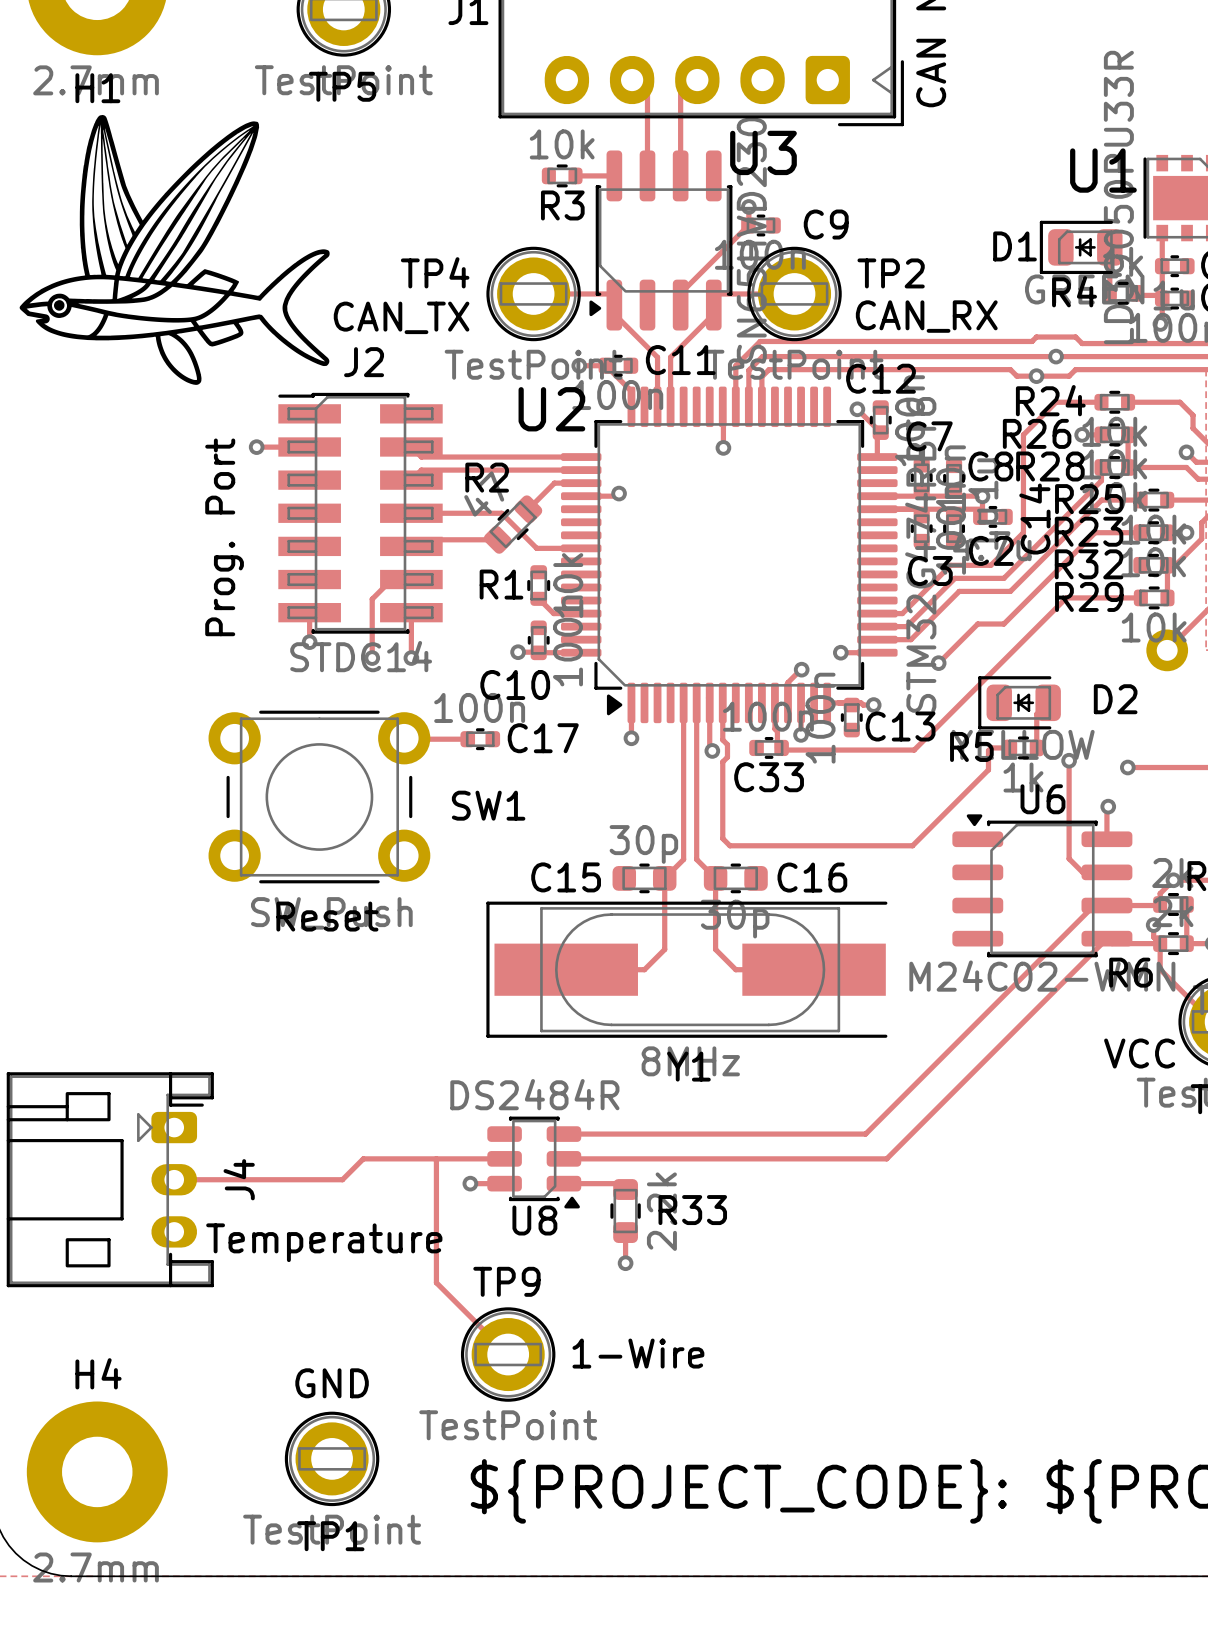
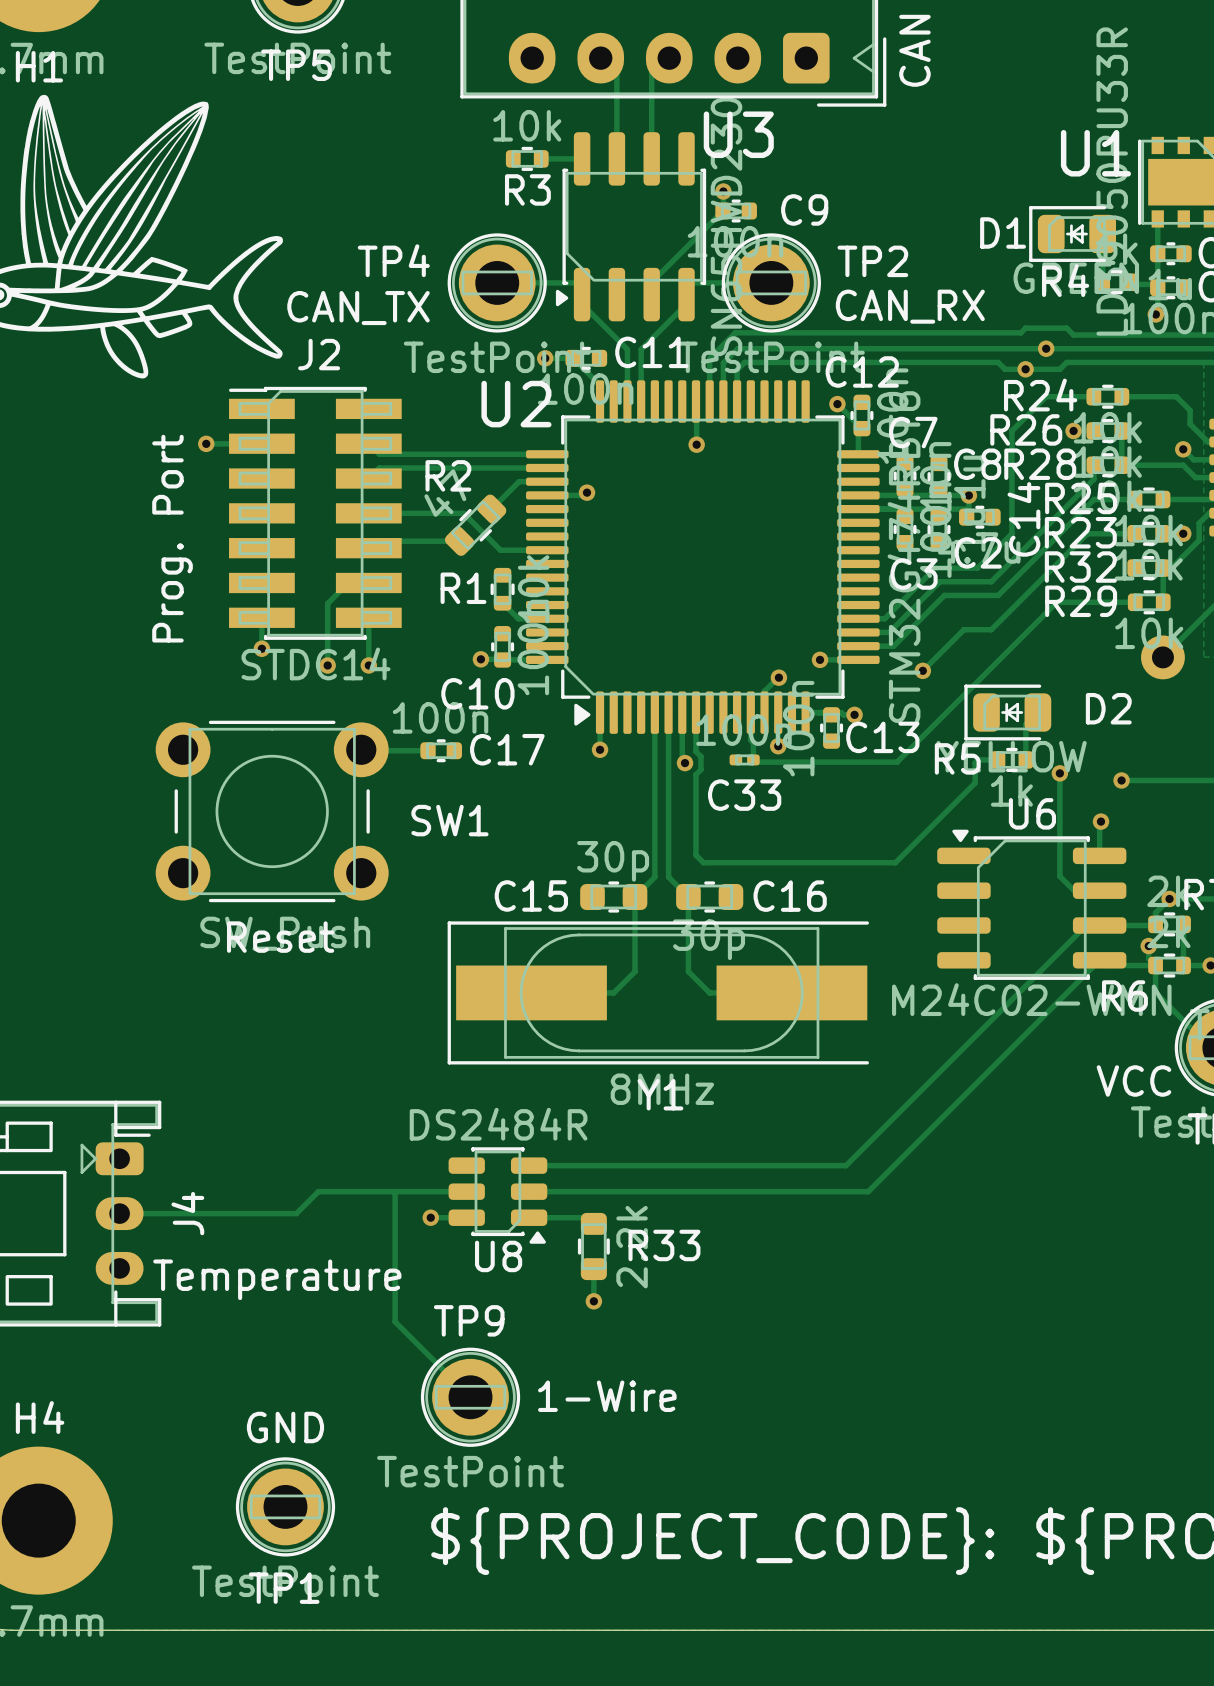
C33 footprint: [749, 736, 789, 759] -> [729, 754, 760, 766]

